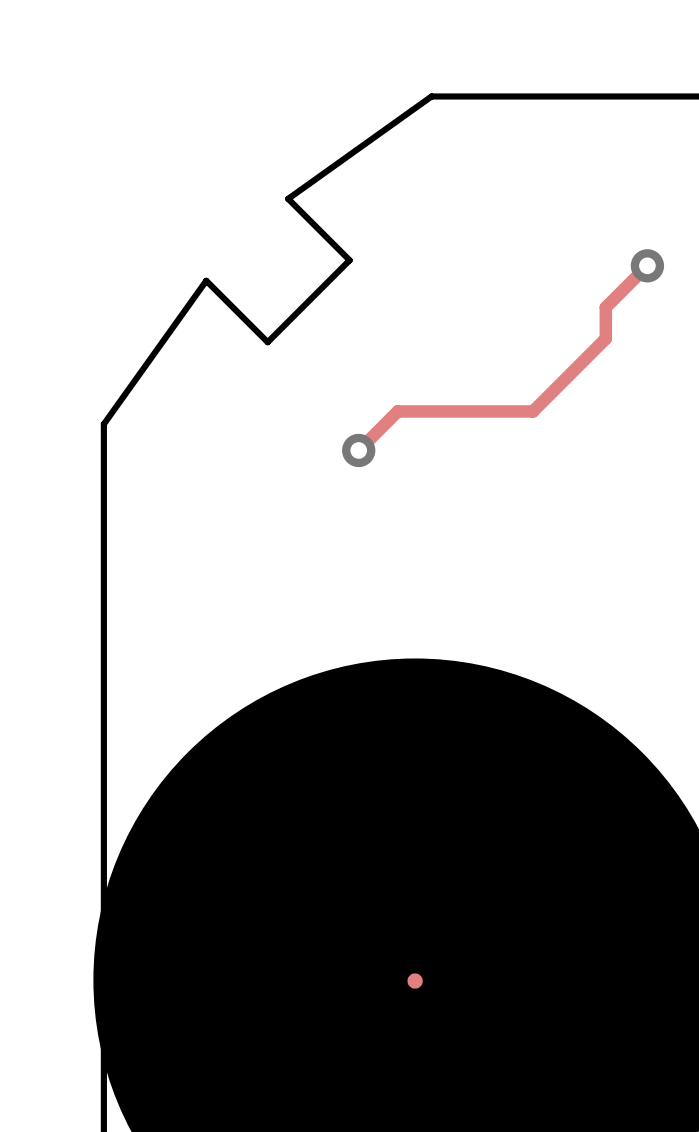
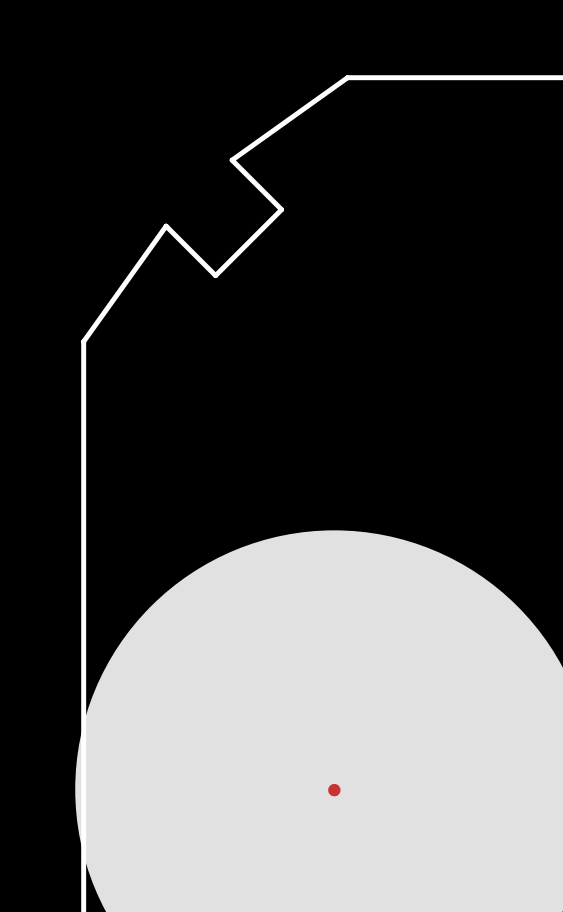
track: (647, 265) (605, 307) (605, 338) (532, 411) (397, 411) (358, 450) -> none
via: (647, 265) -> none
via: (358, 450) -> none

